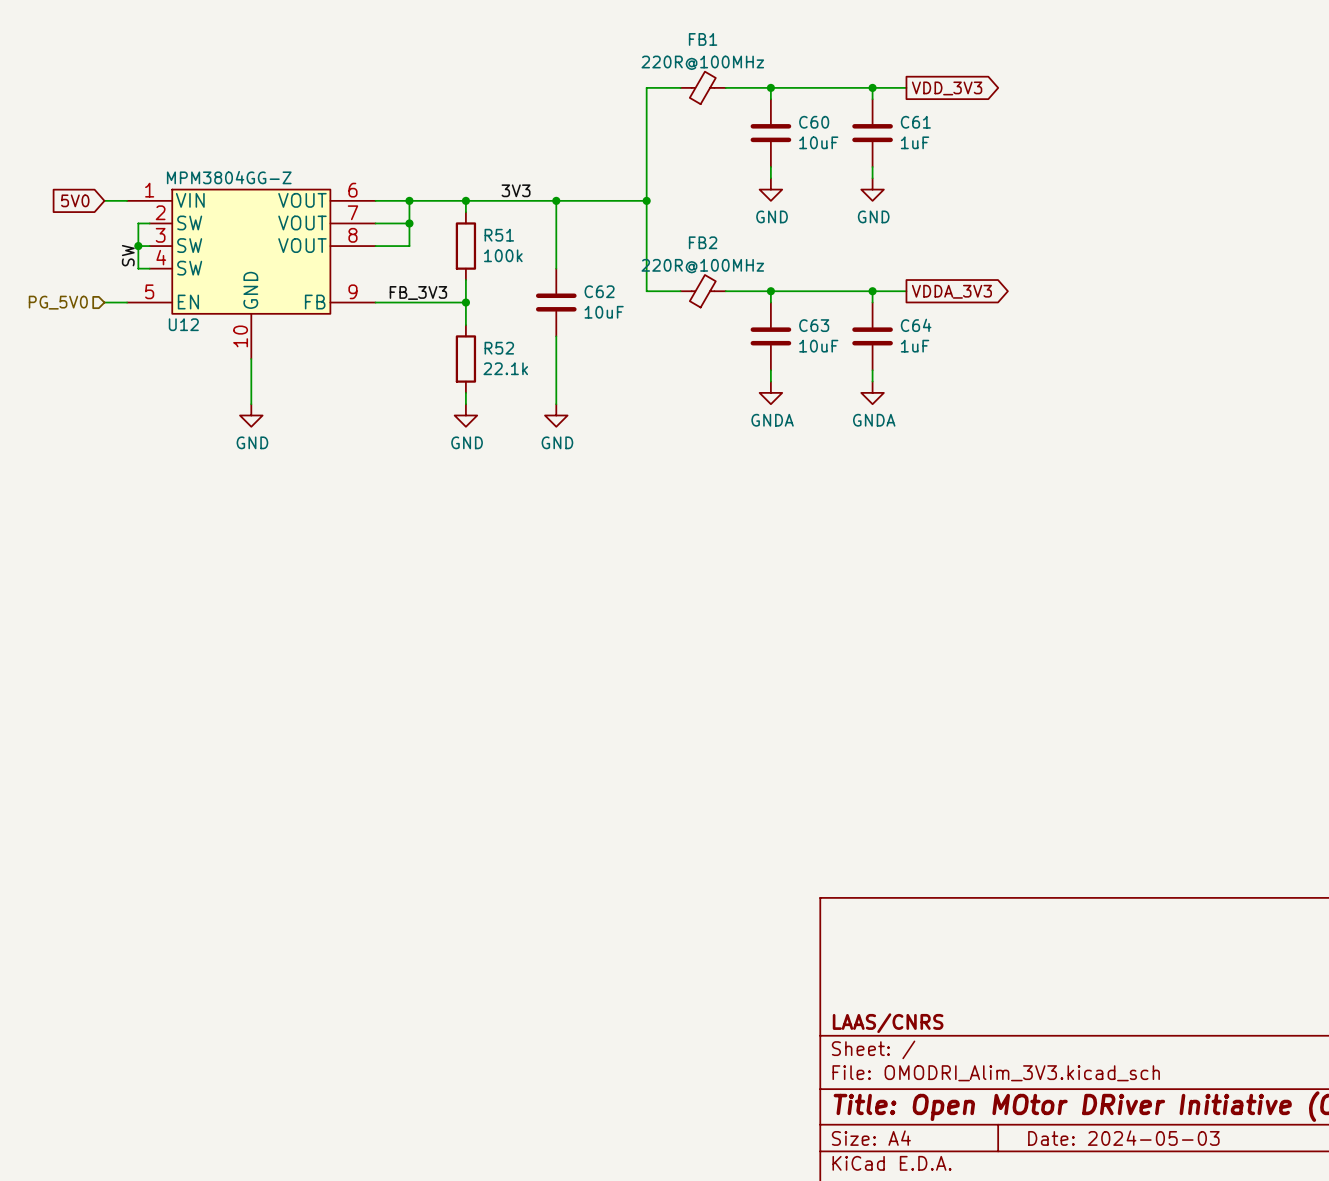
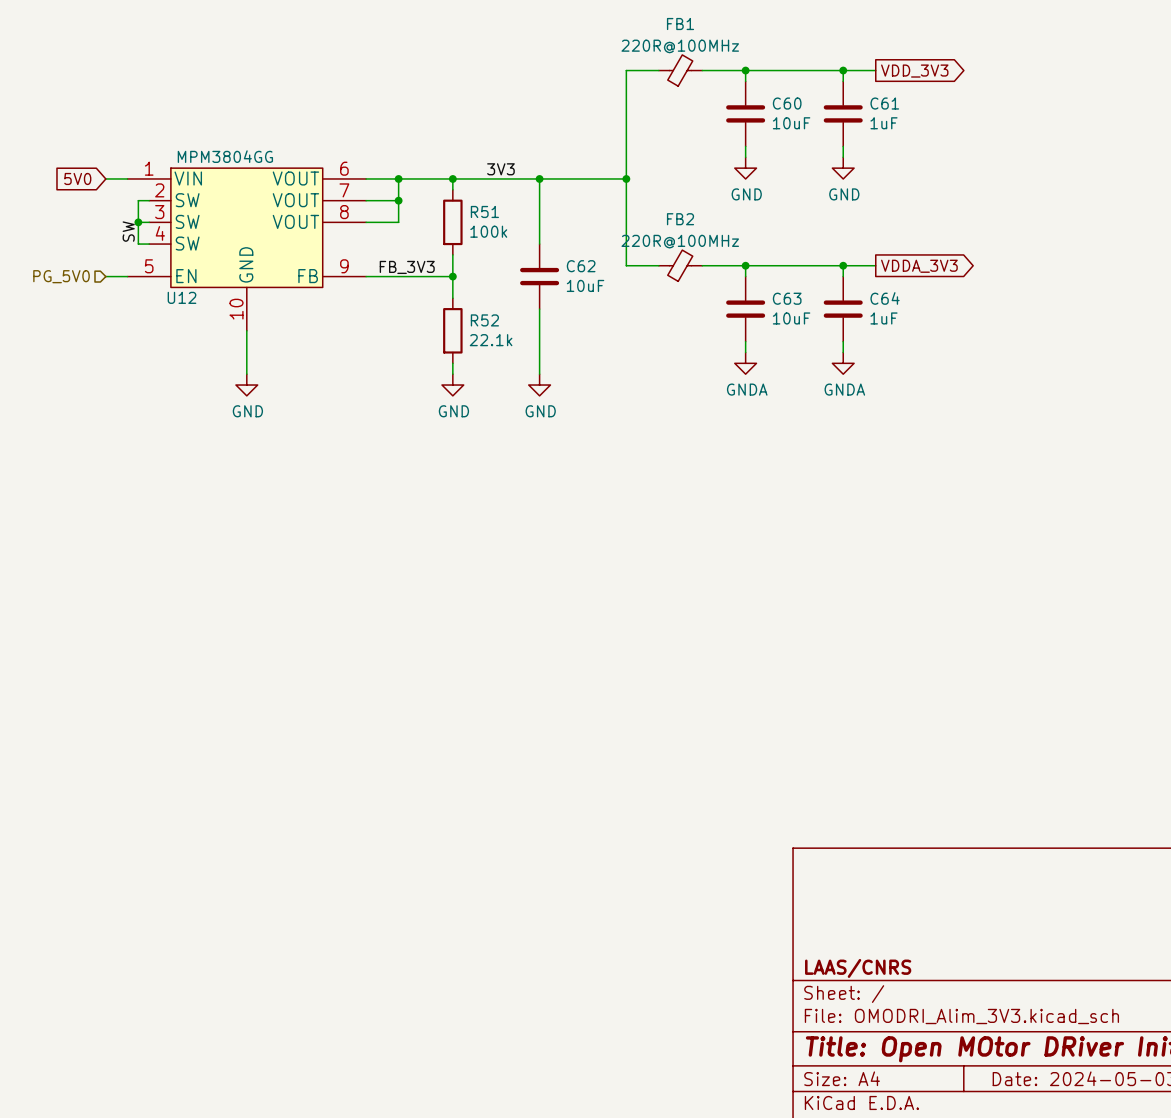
U12 value: MPM3804GG-Z (229, 177) -> MPM3804GG (225, 156)

